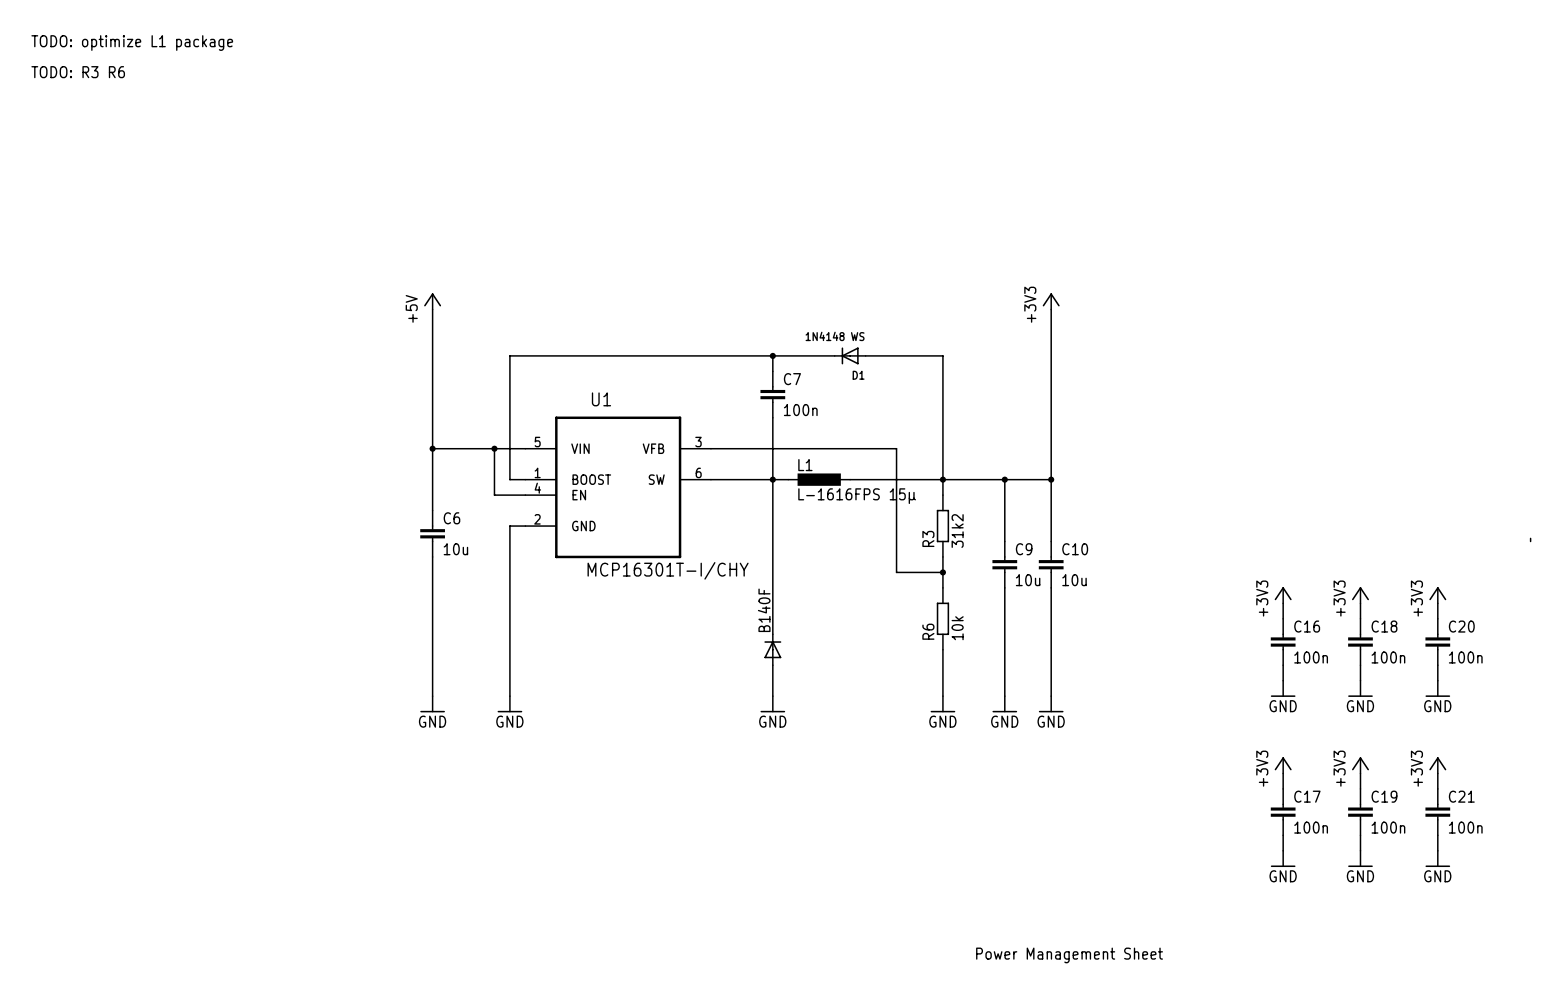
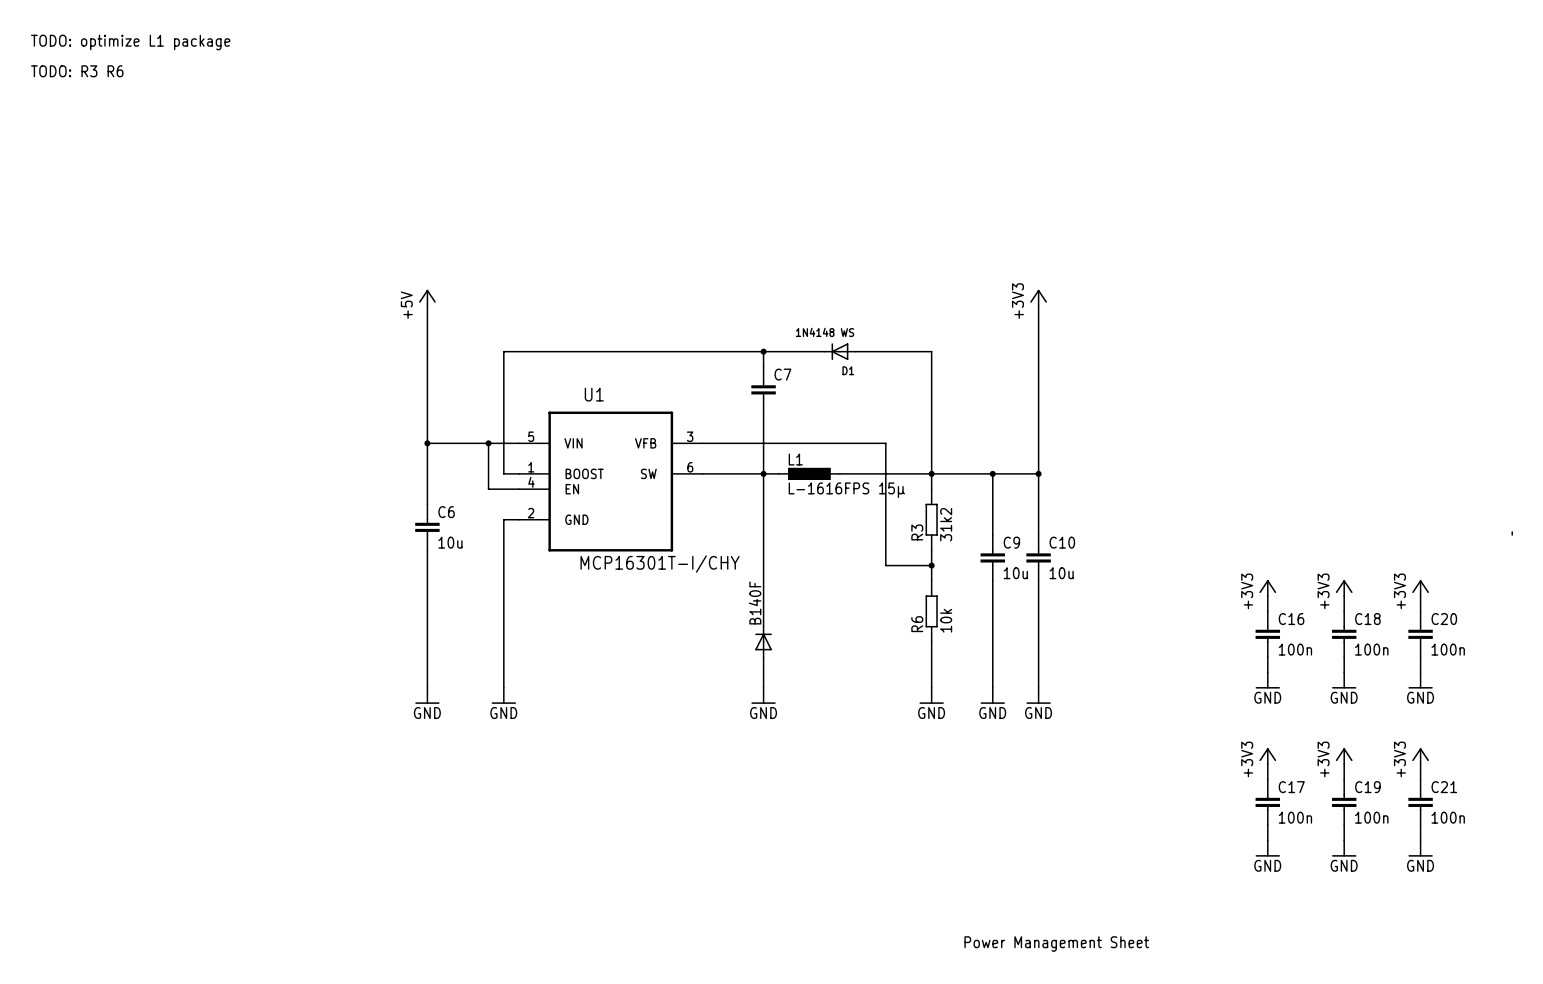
C7 value: 100n (800, 410) -> none

